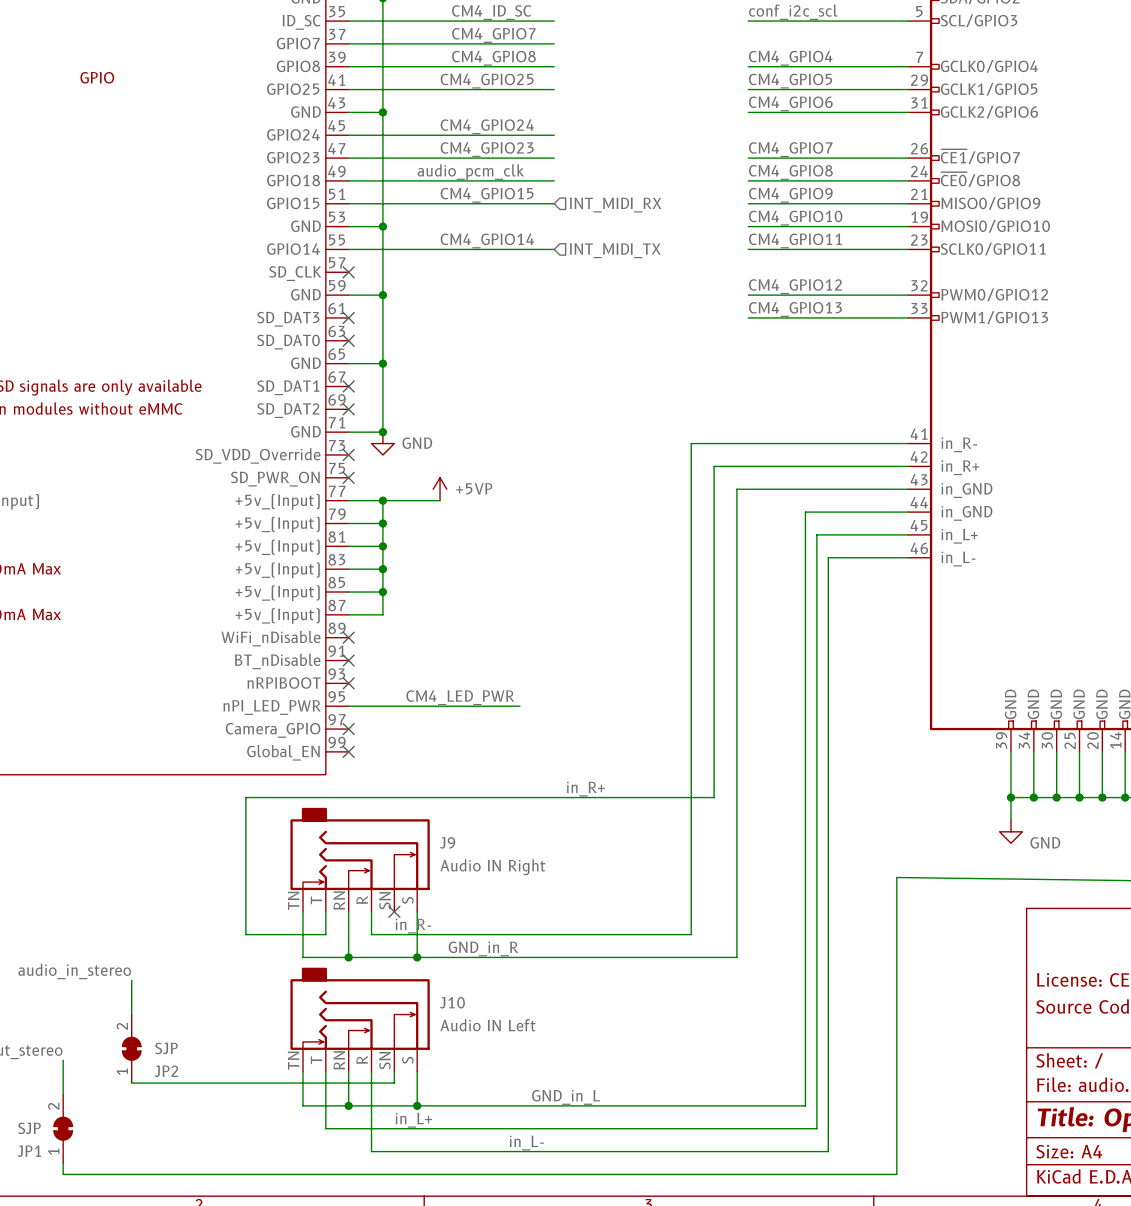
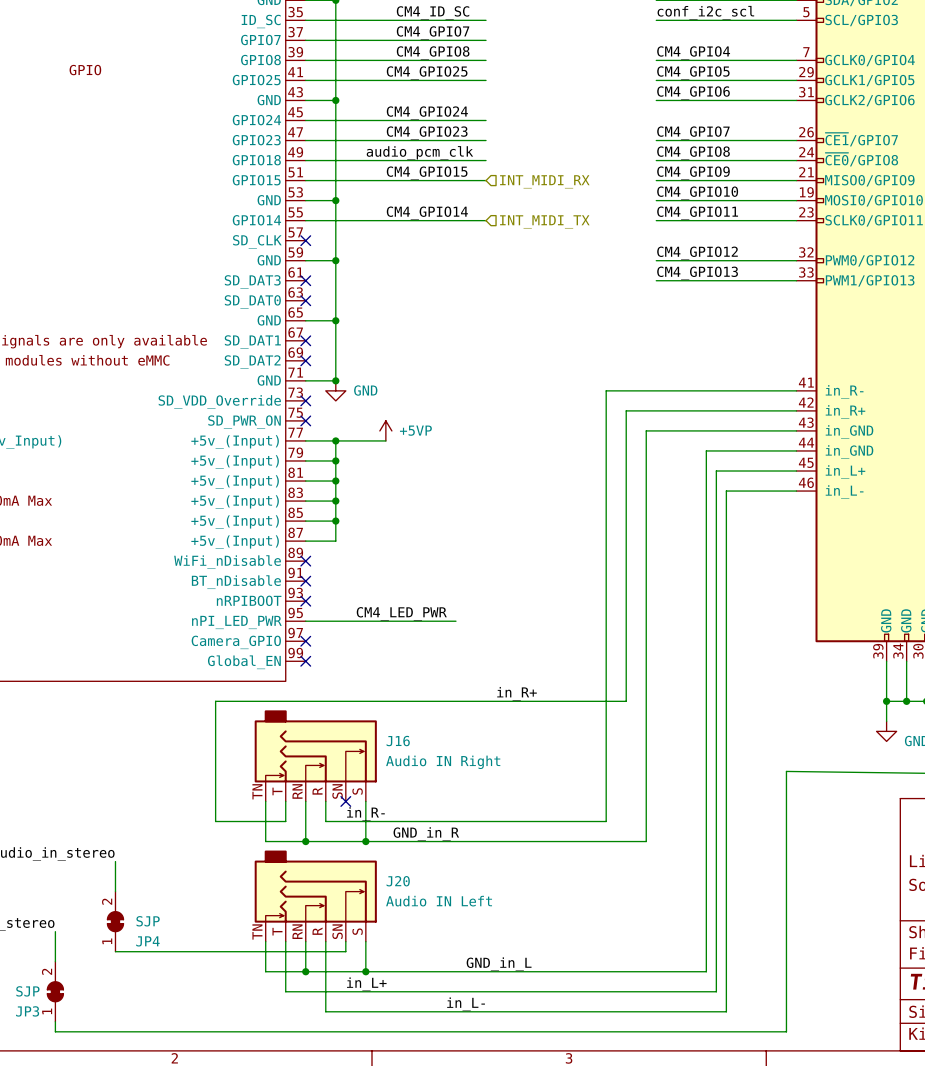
J9 name: J9 (447, 842) -> J16 (398, 741)
J10 name: J10 (452, 1002) -> J20 (398, 881)
JP2 name: JP2 (166, 1071) -> JP4 (147, 941)
JP1 name: JP1 (29, 1151) -> JP3 (27, 1011)

